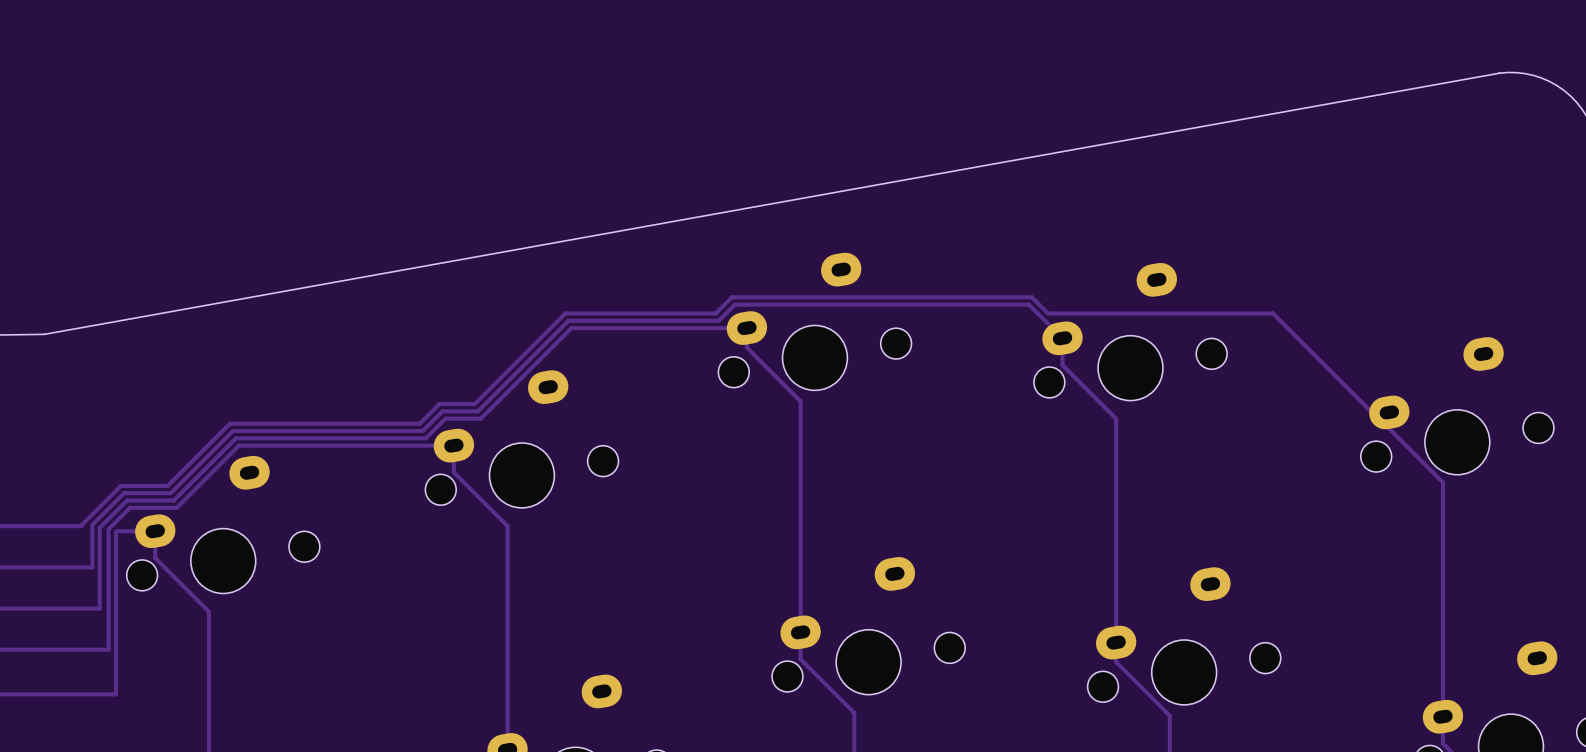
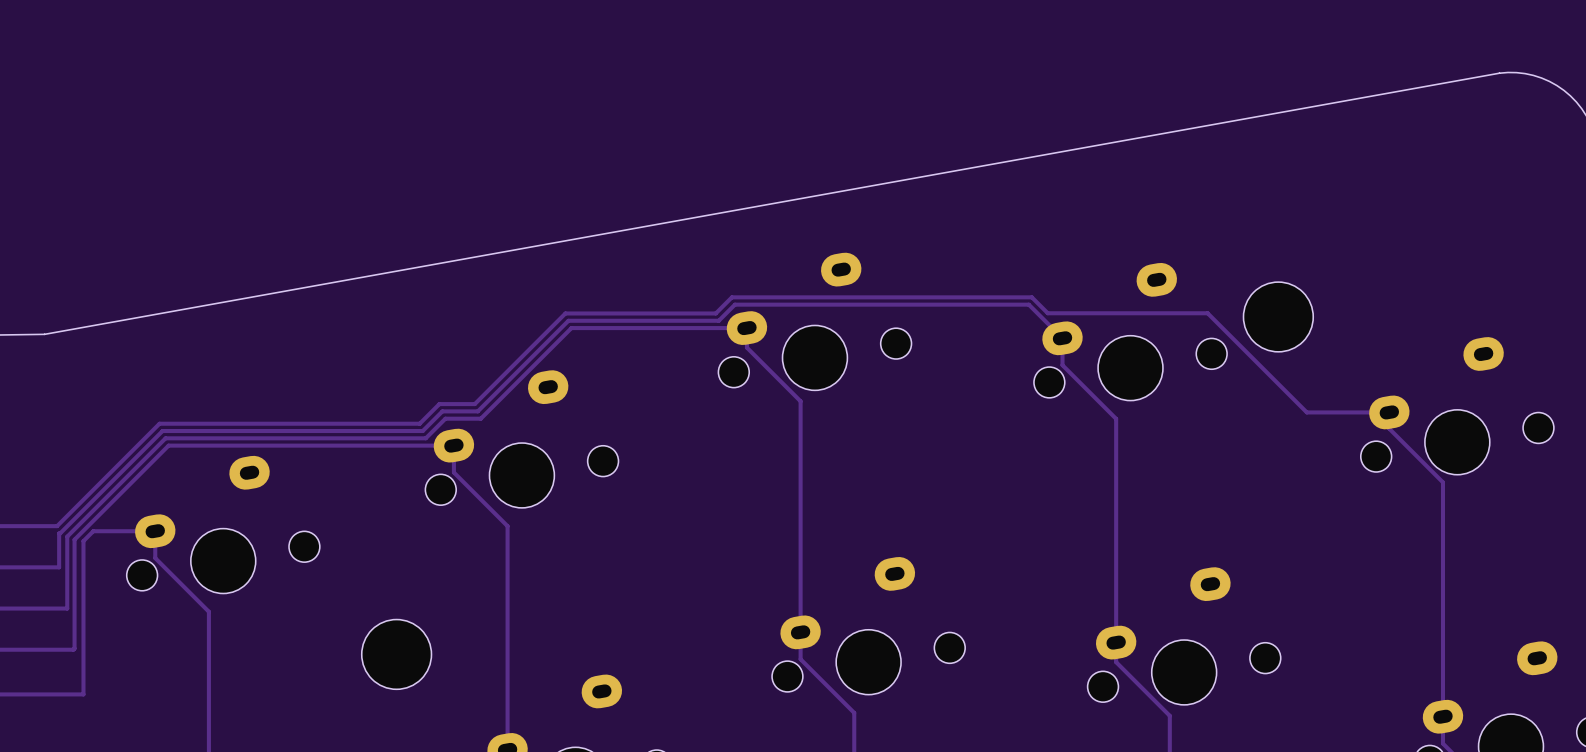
track: (1047, 313) (1272, 313) (1371, 412) -> (1047, 313) (1207, 313) (1306, 412) (1371, 412)
part: none -> (1278, 316)
track: (229, 423) (167, 485) (120, 485) (81, 526) (57, 526) -> (229, 423) (159, 423) (57, 526)
track: (232, 431) (170, 493) (123, 493) (92, 524) (92, 567) (59, 567) -> (232, 431) (162, 431) (59, 533) (59, 567)
track: (236, 438) (173, 500) (126, 500) (99, 527) (99, 608) (67, 608) -> (236, 438) (165, 438) (67, 536) (67, 608)
track: (239, 445) (176, 507) (130, 507) (108, 529) (108, 649) (73, 649) -> (239, 445) (168, 445) (74, 539) (73, 649)
track: (116, 531) (115, 694) (83, 694) -> (116, 531) (93, 531) (83, 541) (83, 694)
part: none -> (396, 654)

